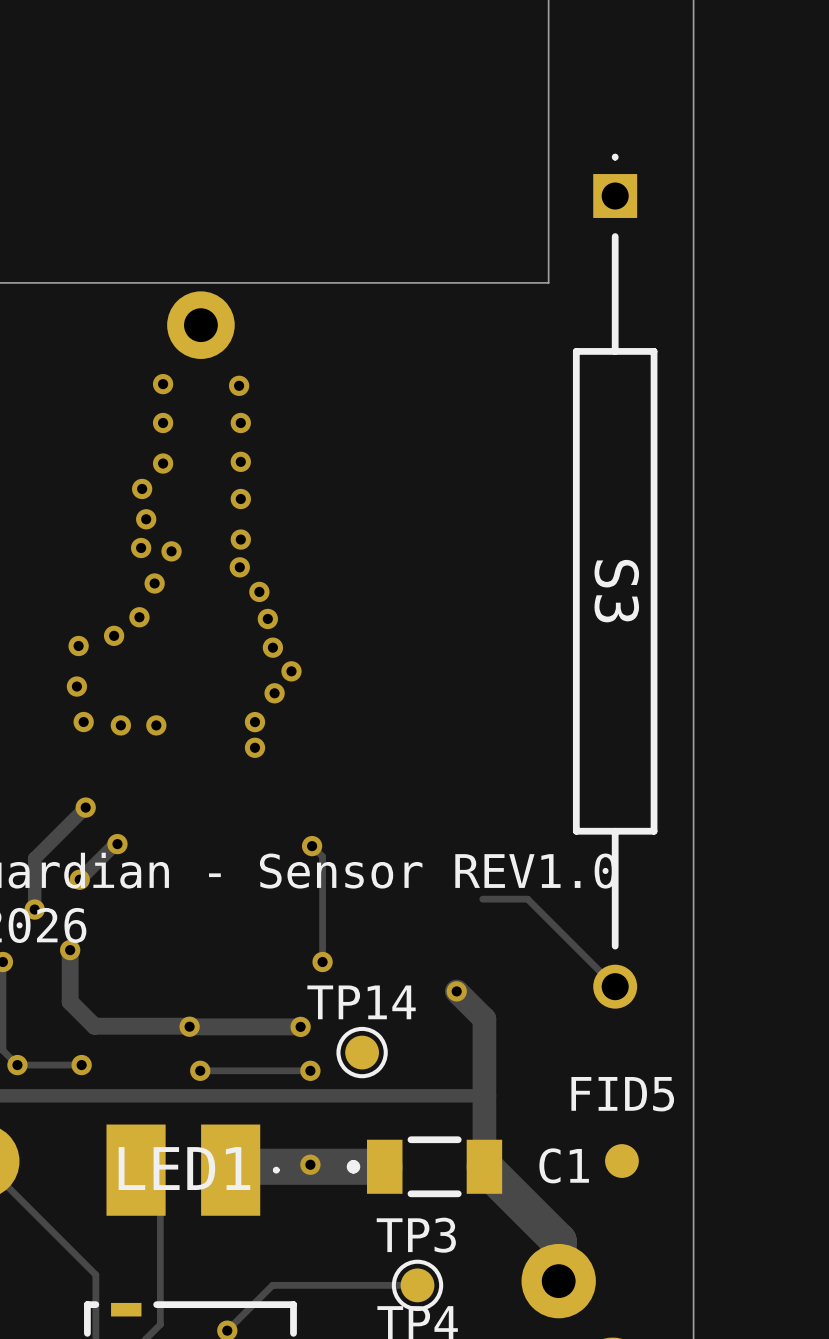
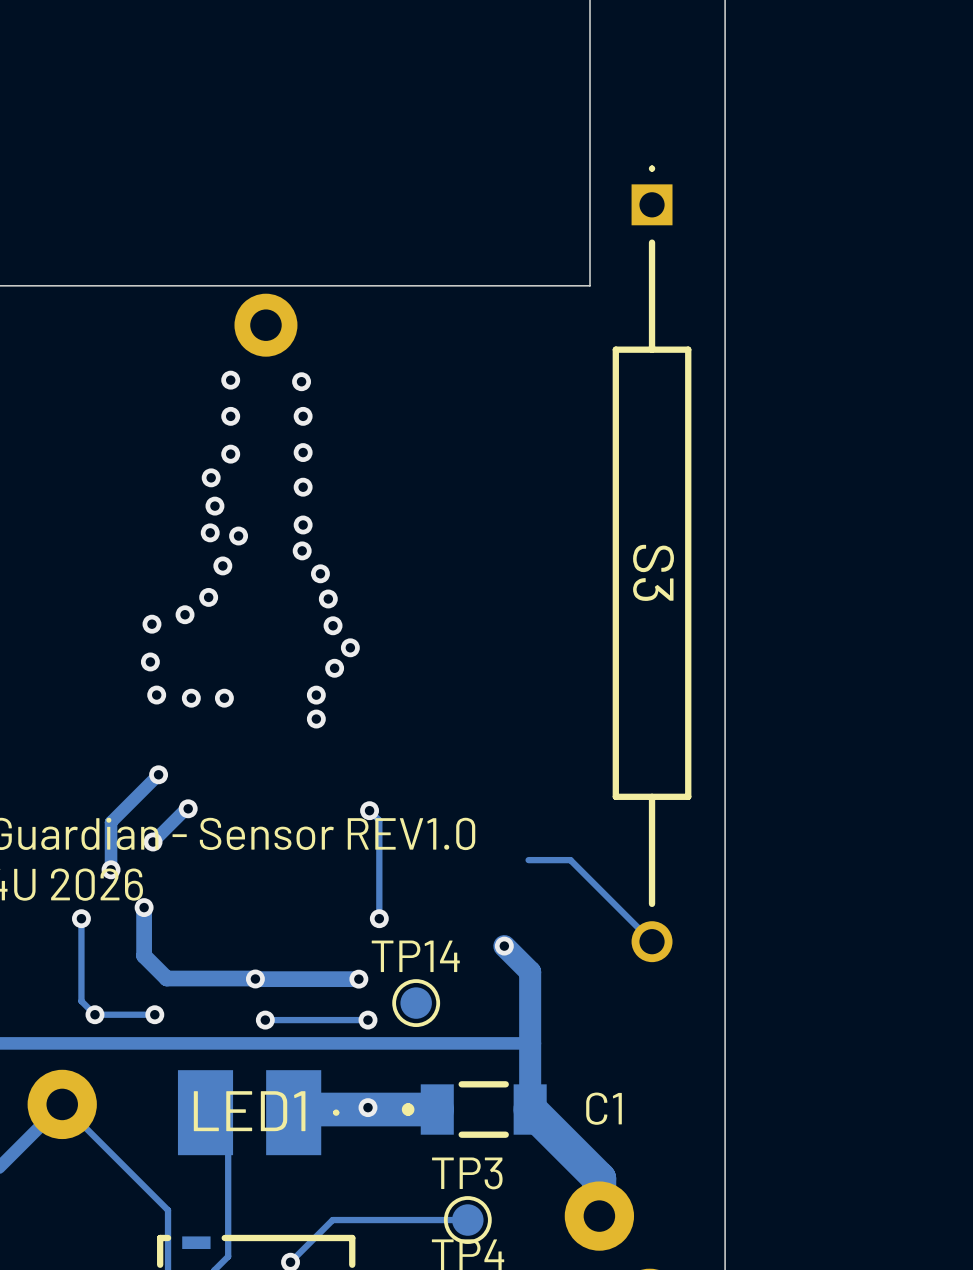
FID5: (621, 1161) -> none

